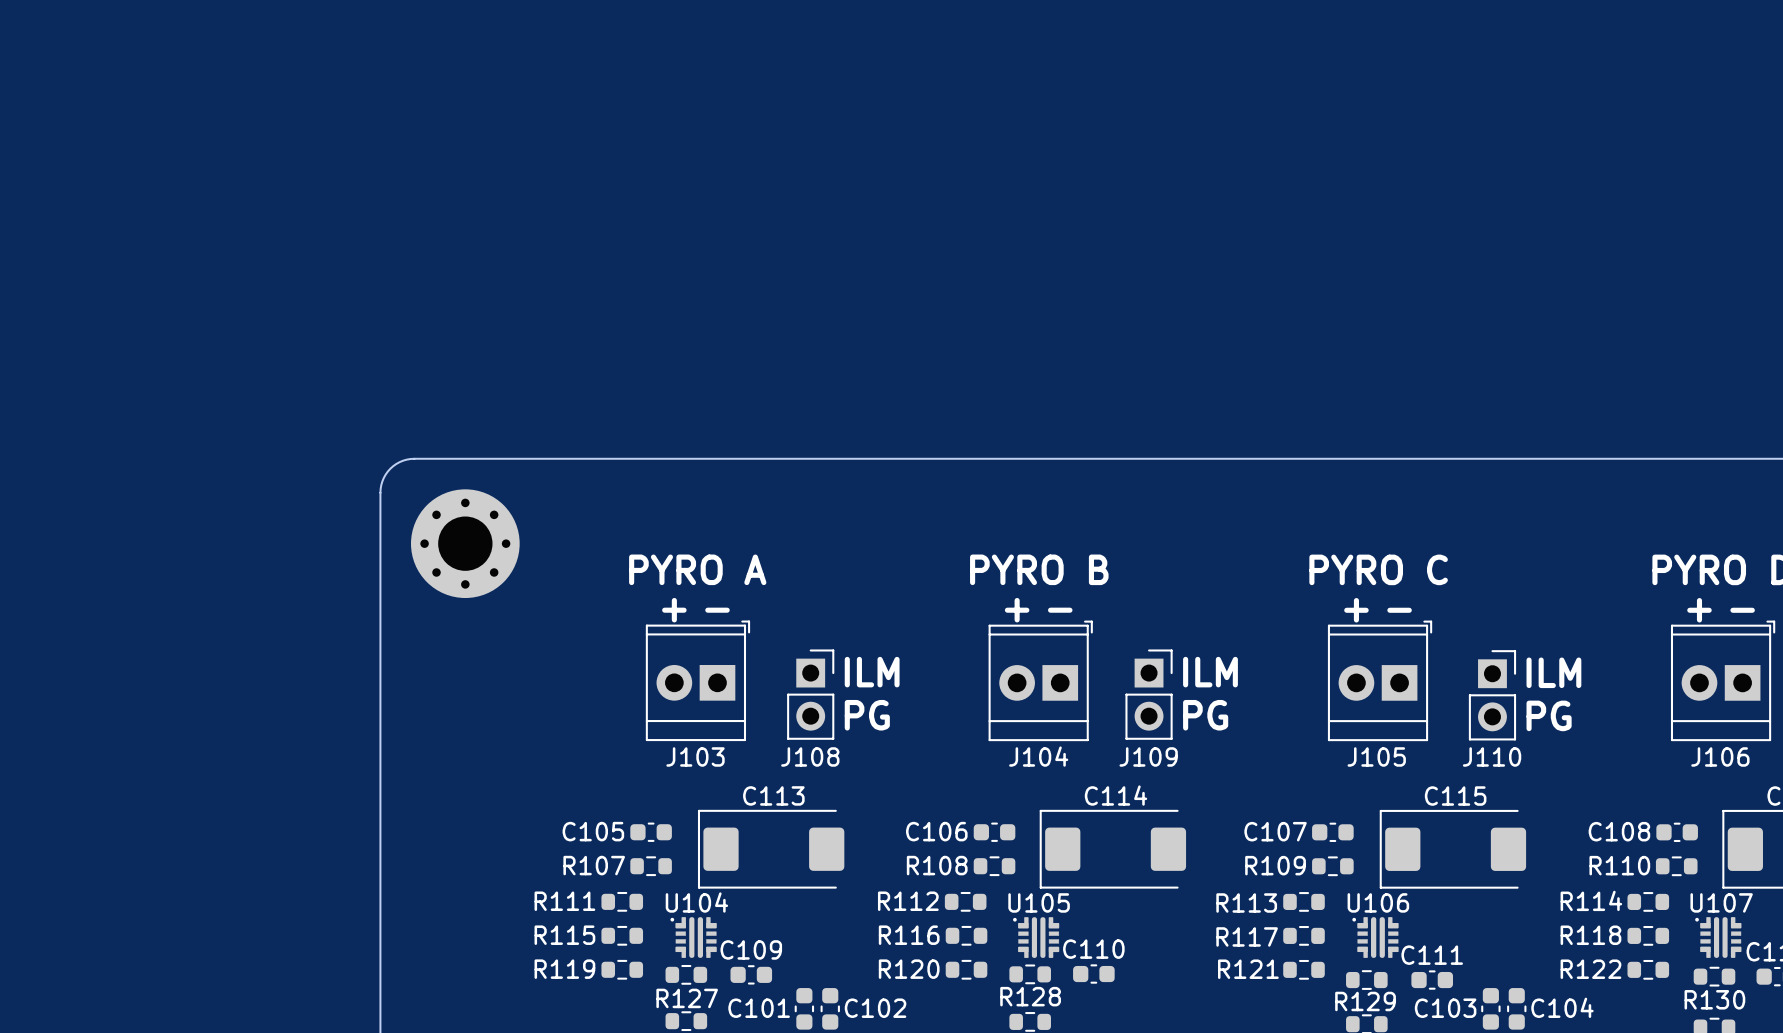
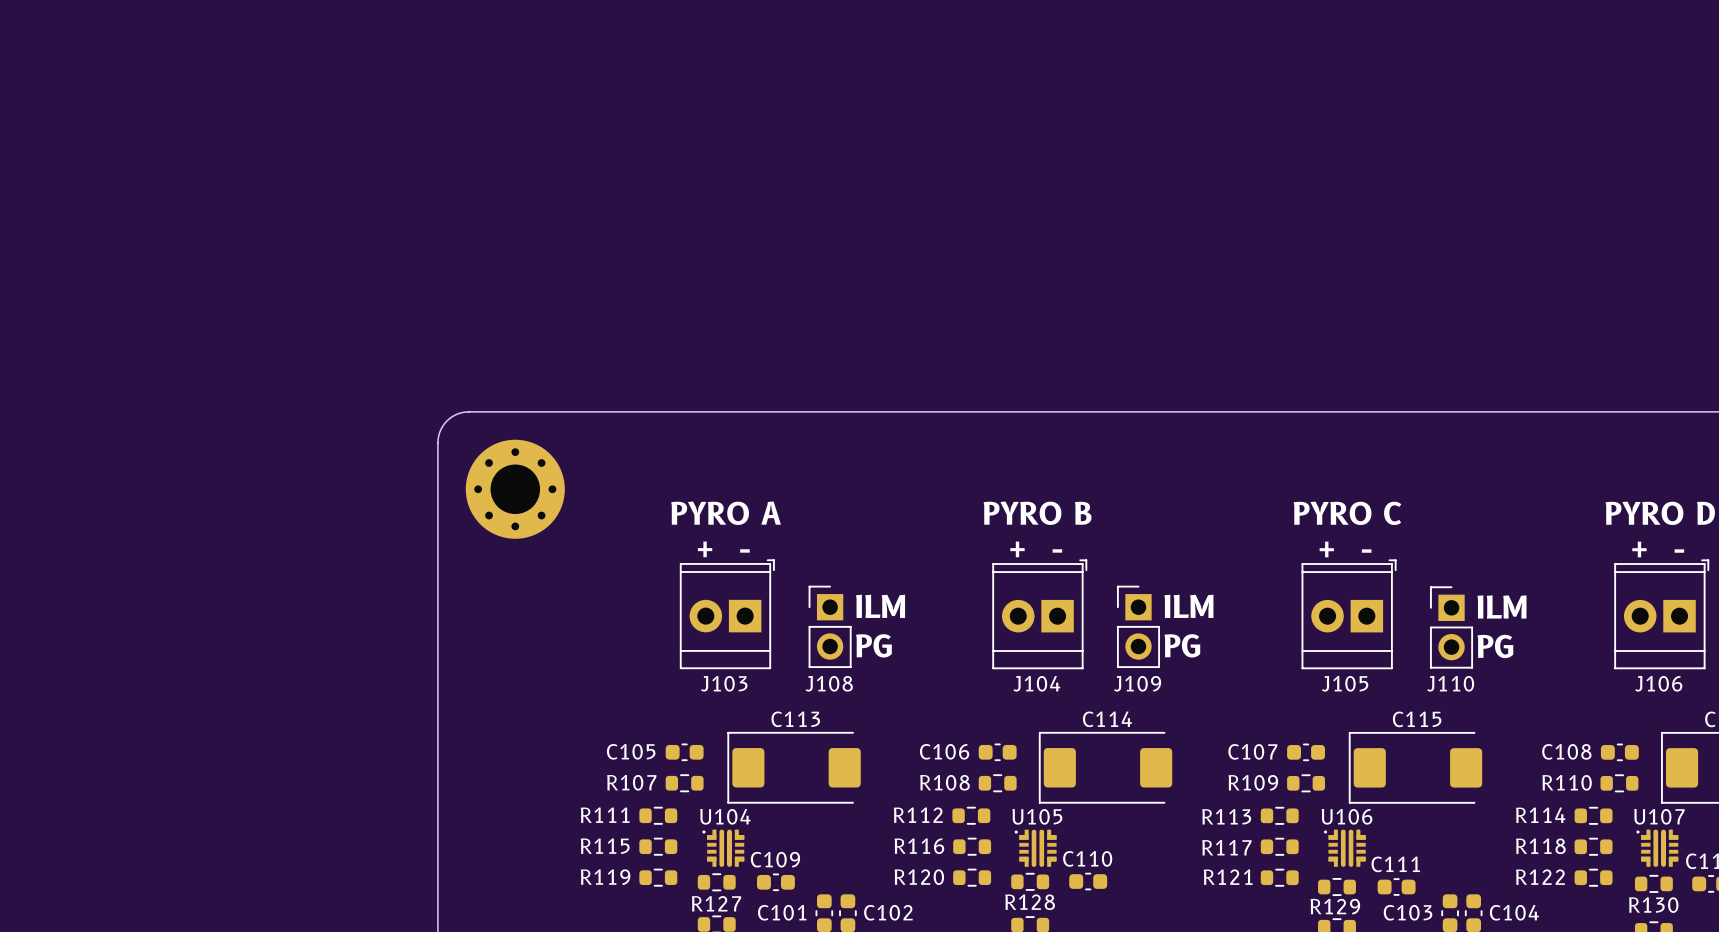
J108 footprint: [787, 649, 835, 740] -> [808, 585, 852, 669]
J109 footprint: [1125, 649, 1173, 740] -> [1116, 585, 1161, 669]
J110 footprint: [1468, 650, 1517, 741] -> [1430, 586, 1474, 669]

